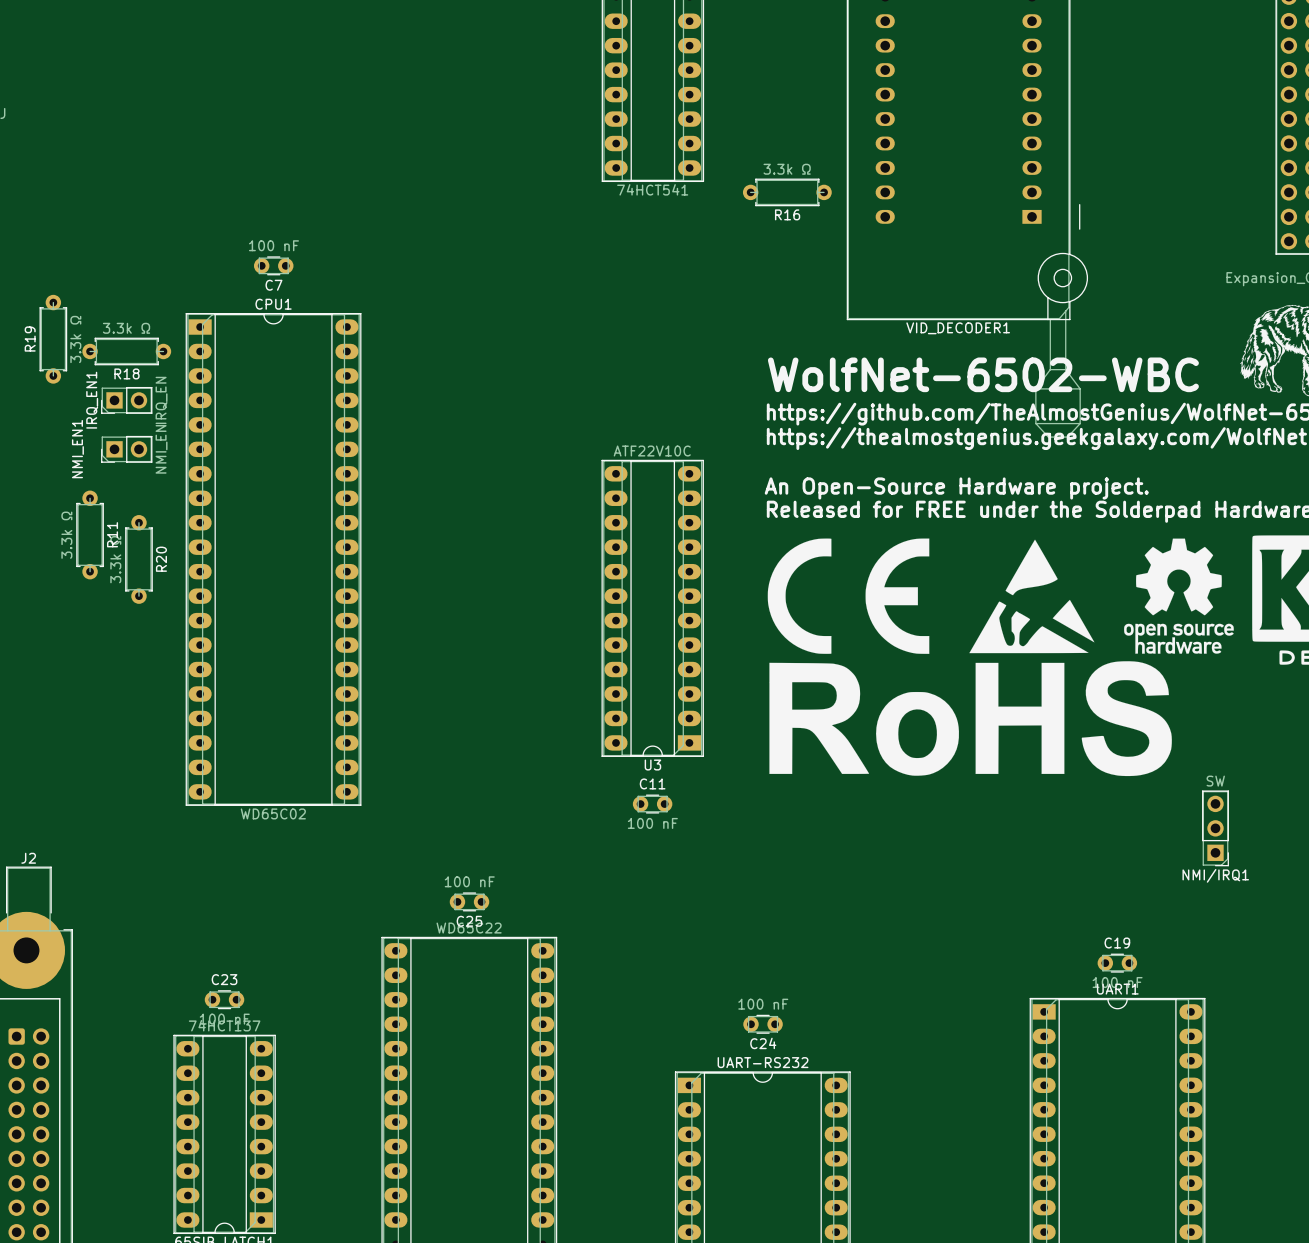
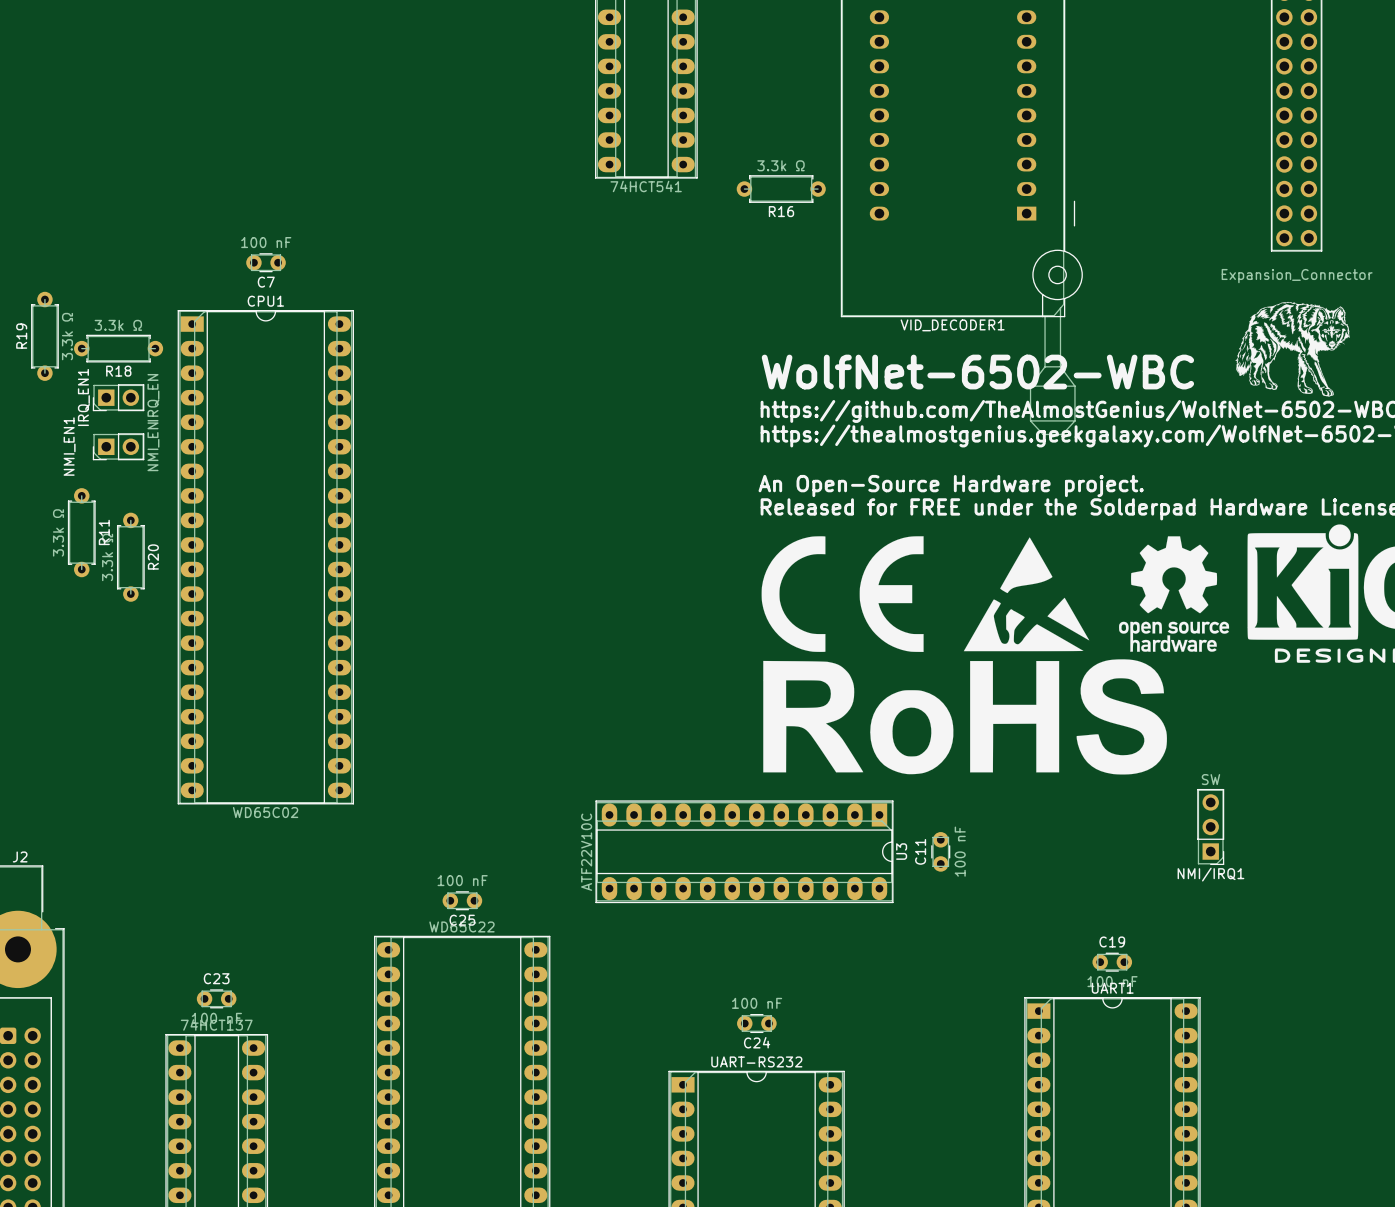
U3 rotation: 0° (652, 608) -> 90° counterclockwise (744, 851)
U3 position: (652, 608) -> (744, 851)
C11 name position: C11 (652, 783) -> C11 (920, 851)
C11 rotation: 0° (652, 804) -> 90° clockwise (940, 851)
C11 position: (652, 804) -> (940, 851)
C11 value position: 100 nF (652, 823) -> 100 nF (960, 851)

